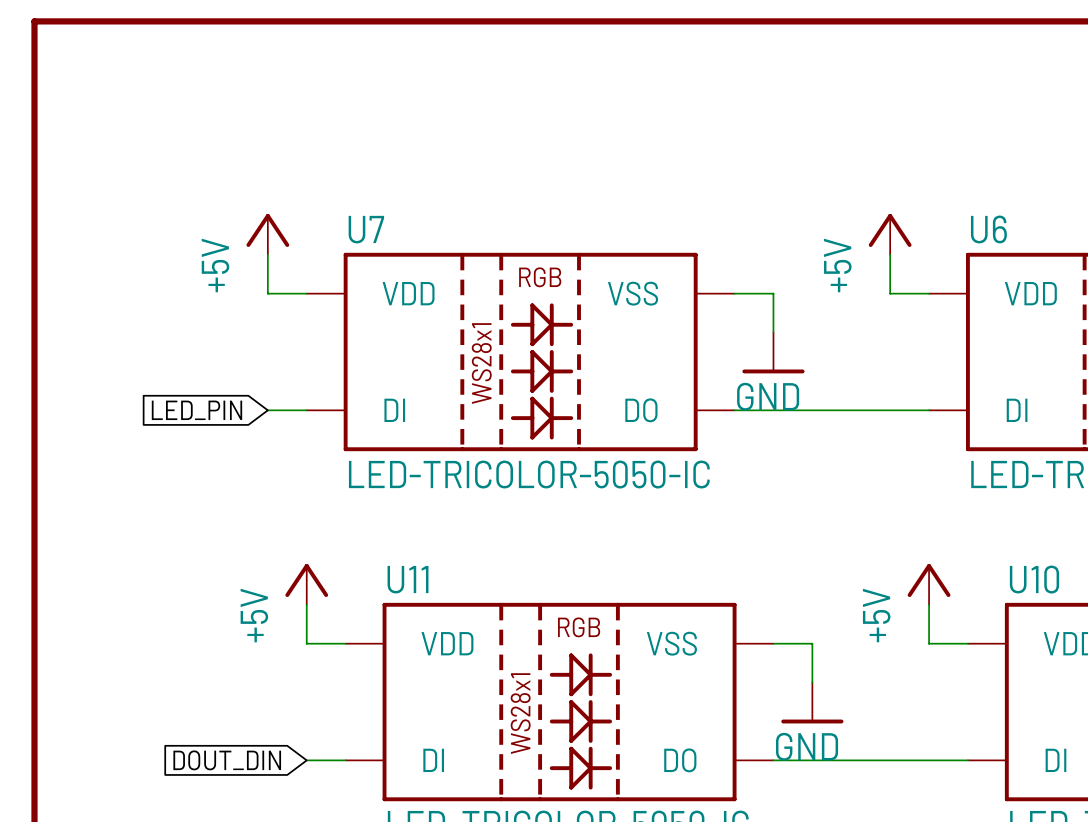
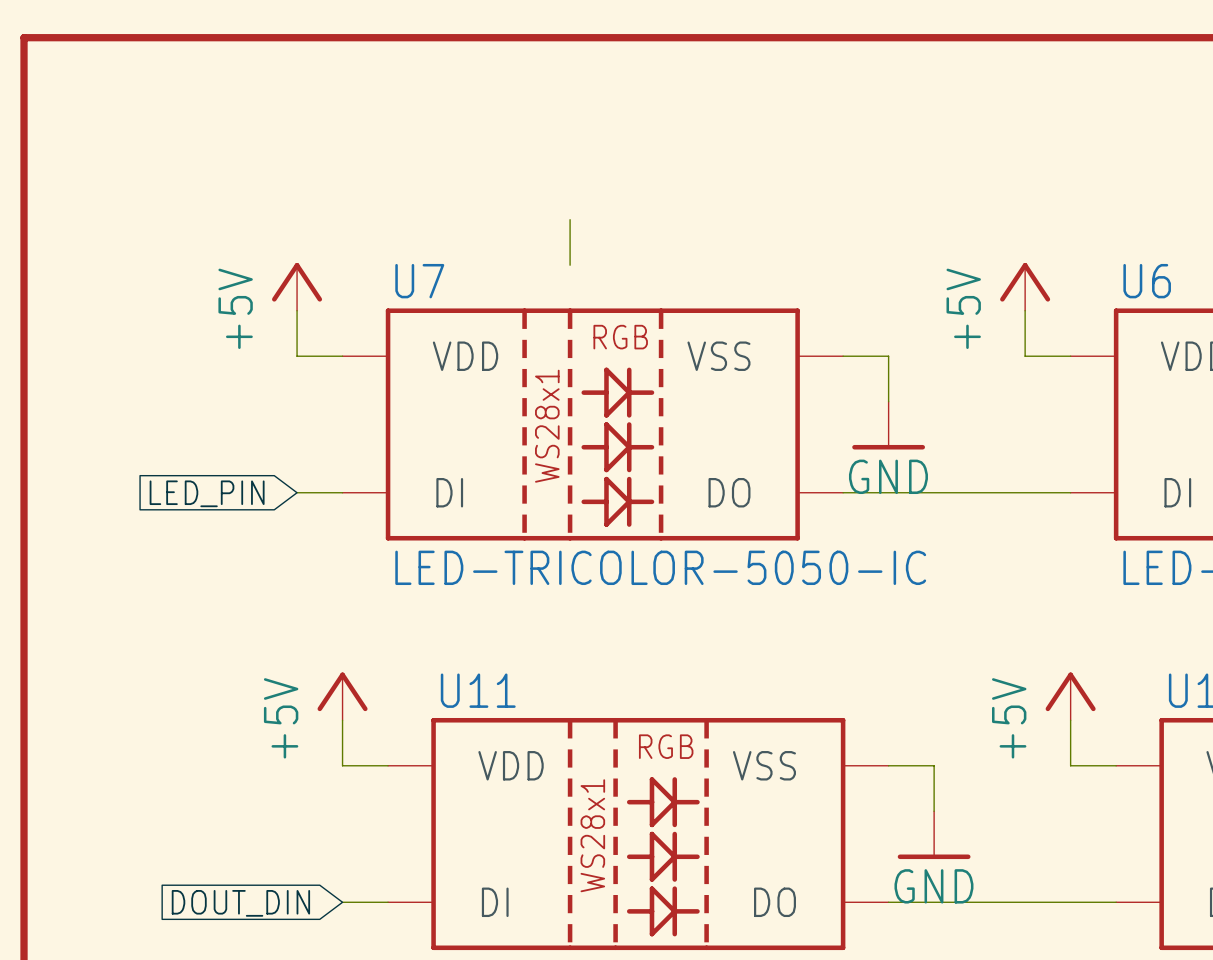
wire: none -> (570, 219) (570, 265)

